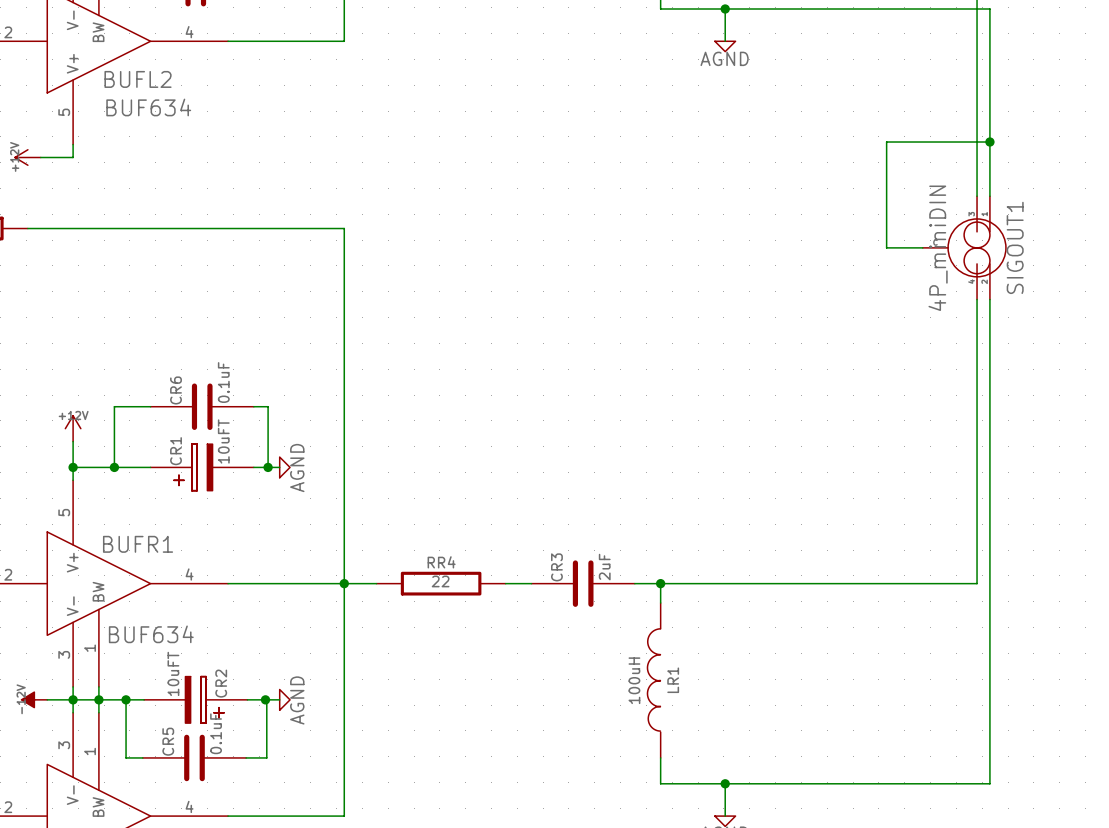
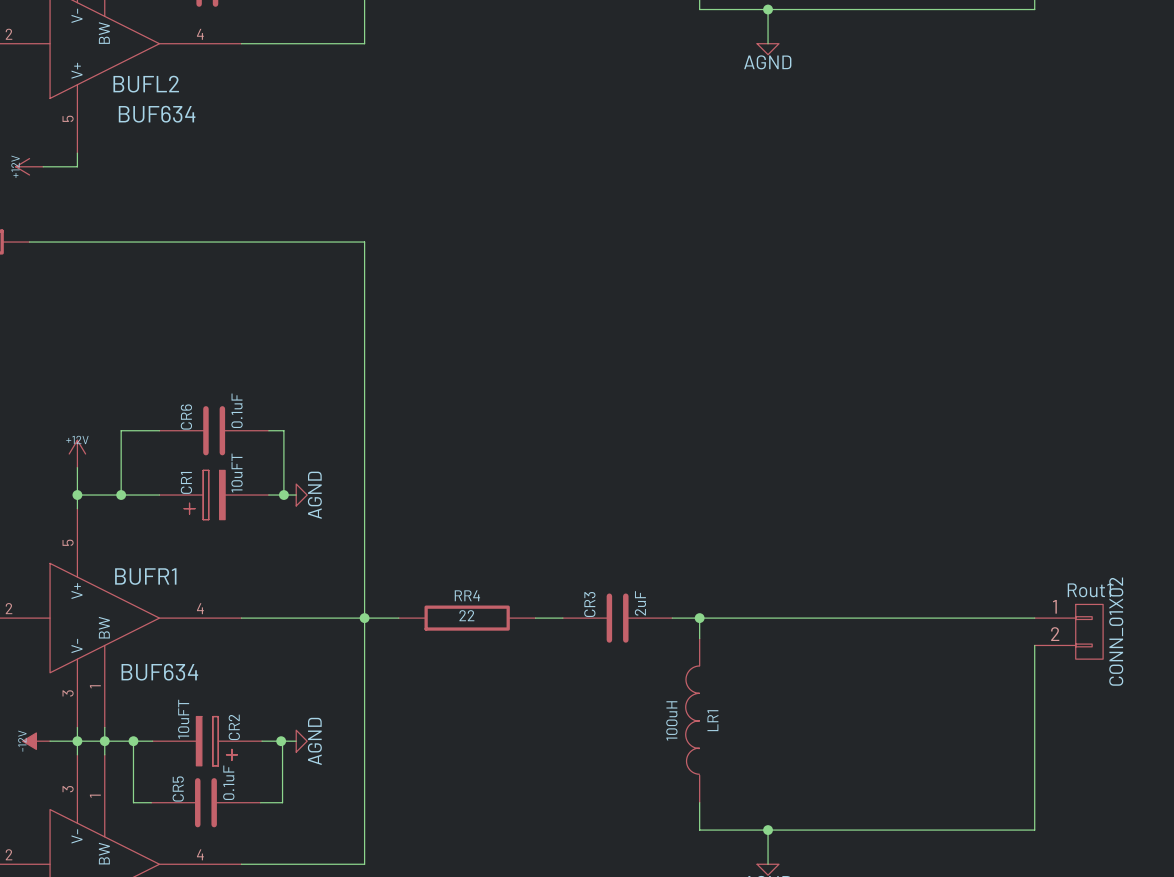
wire: (989, 142) (886, 142) (886, 247) (922, 247) -> none
junction: (989, 142) -> none
wire: (977, 196) (977, 9) (989, 9) (989, 196) -> none
SIGOUT1: 4P_miniDIN (964, 247) -> none
wire: (977, 299) (977, 583) -> none
wire: (989, 299) (989, 783) (977, 783) -> (1034, 645) (1034, 830)
Rout1: none -> CONN_01X02 (1068, 631)

